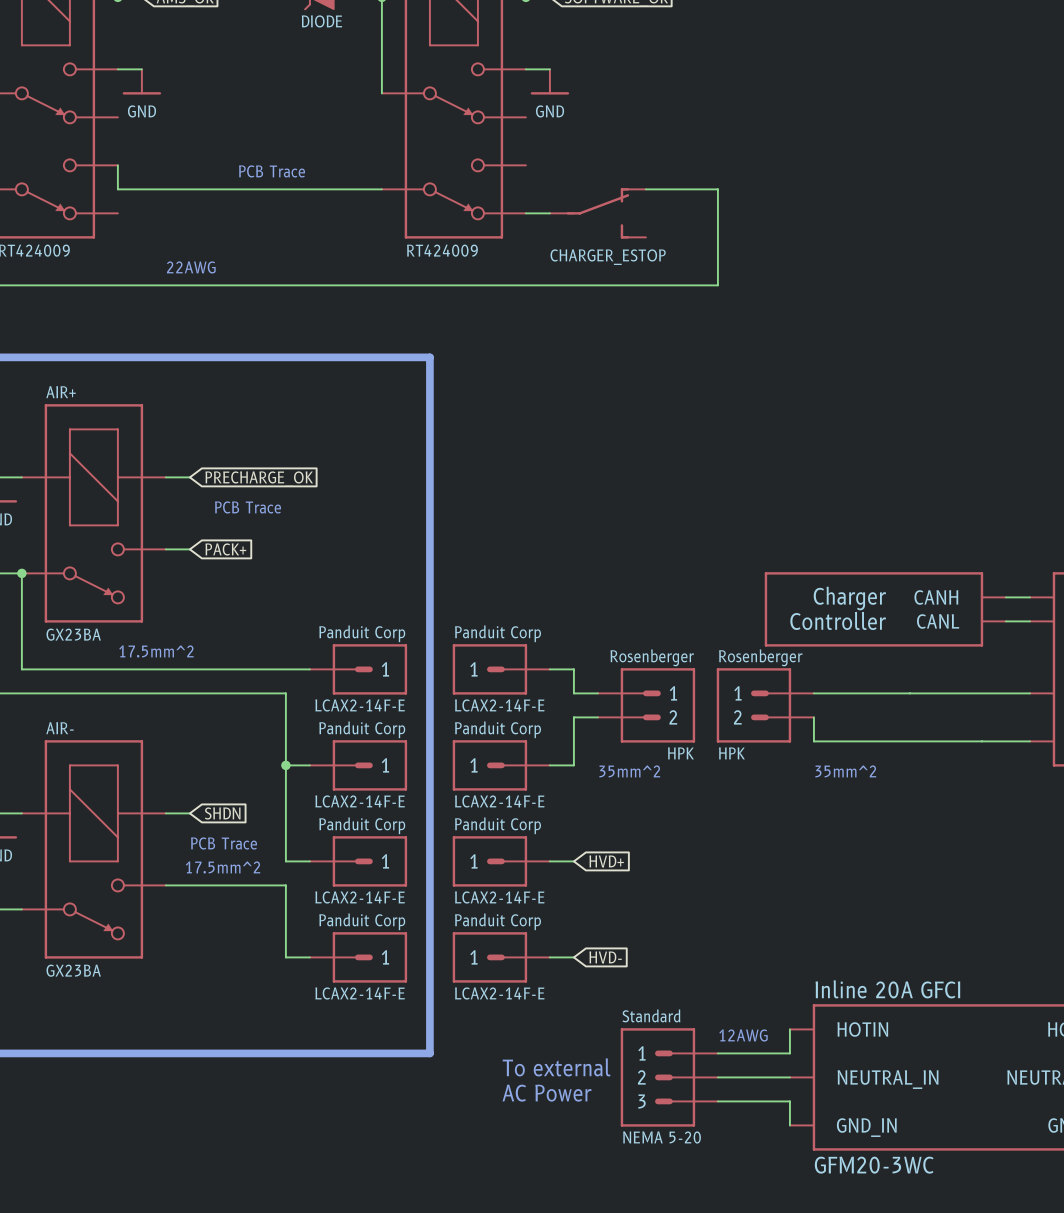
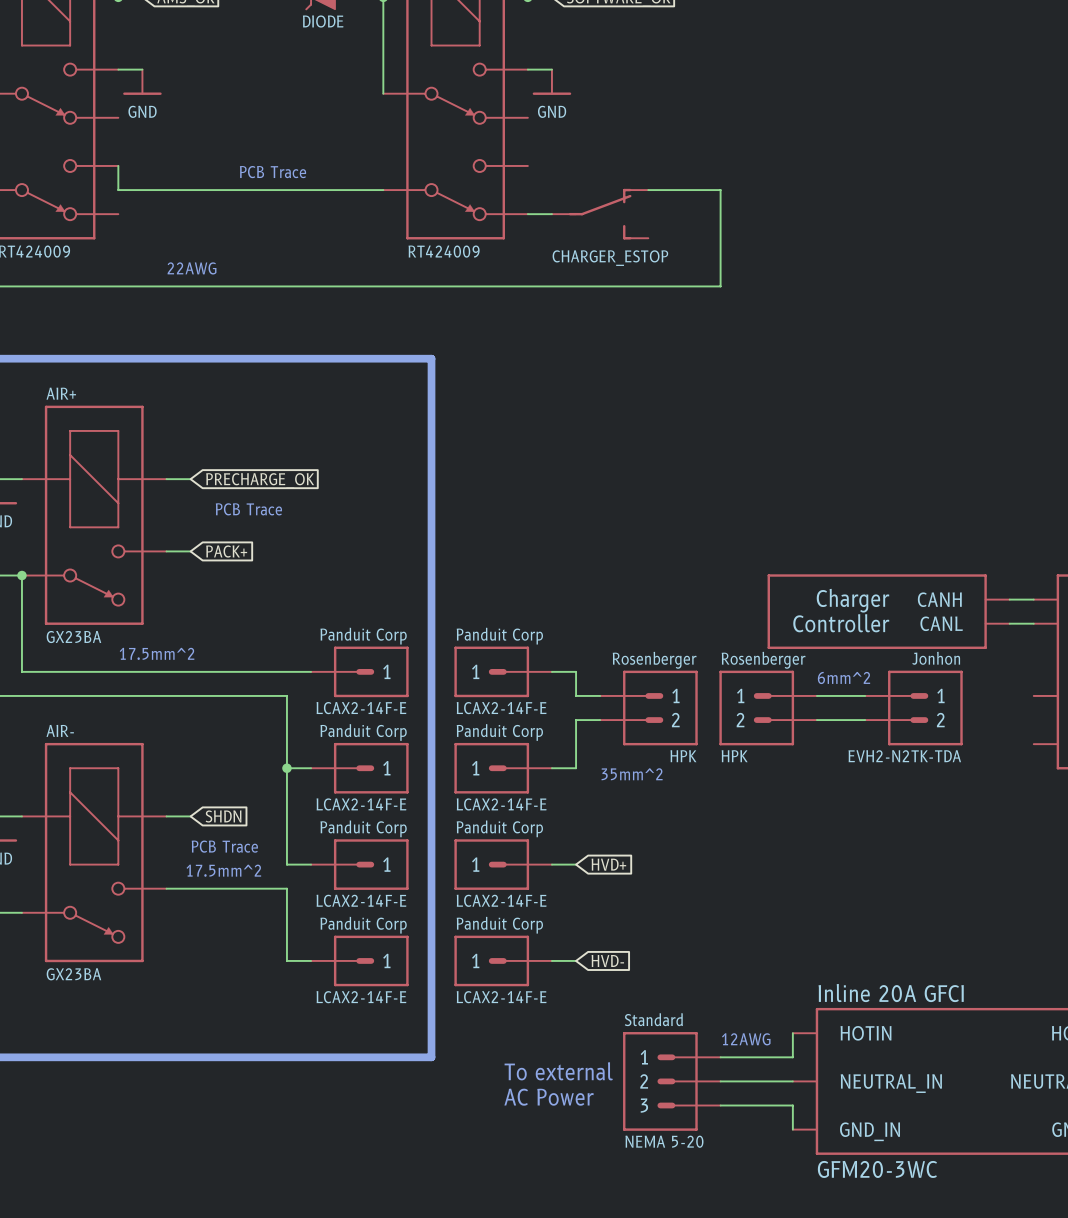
text: none -> 6mm^2 (843, 677)
wire: (861, 693) (1029, 693) -> none
part: none -> (913, 708)
wire: (813, 717) (813, 741) (1029, 741) -> (816, 720) (865, 720)
text: 35mm^2 (845, 771) -> none

